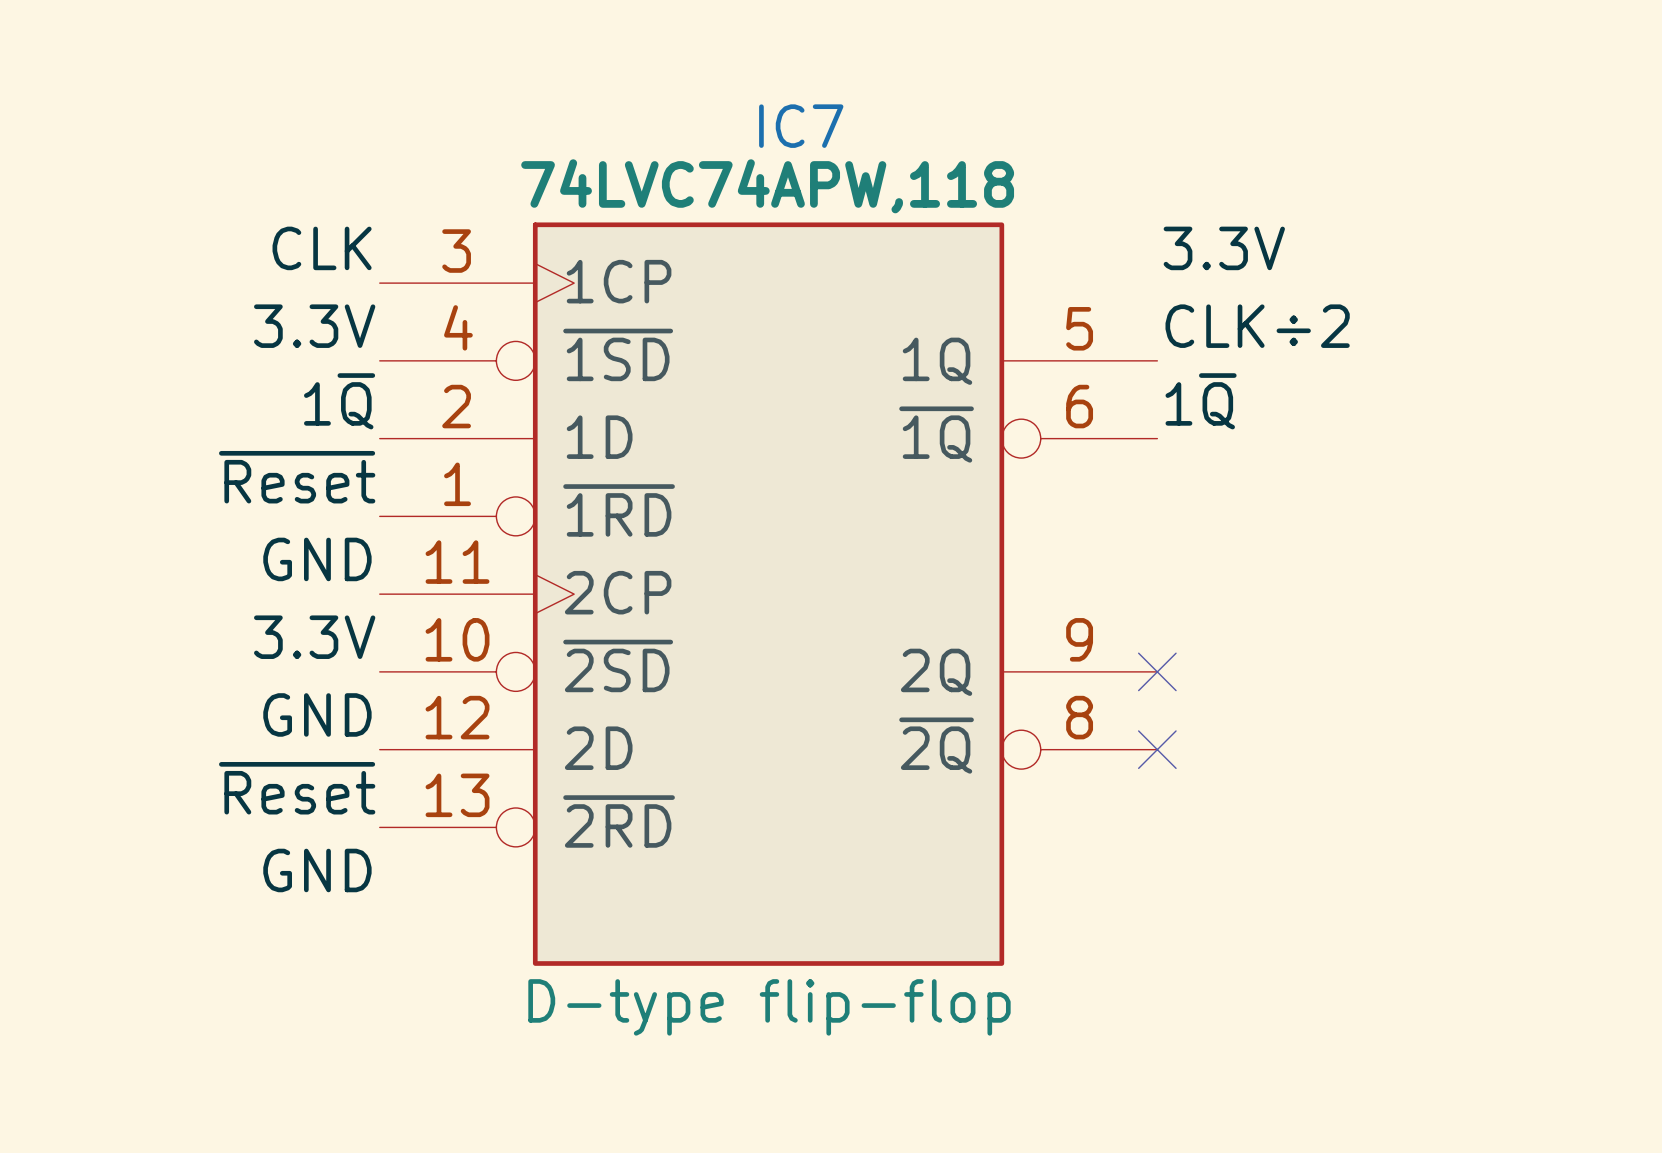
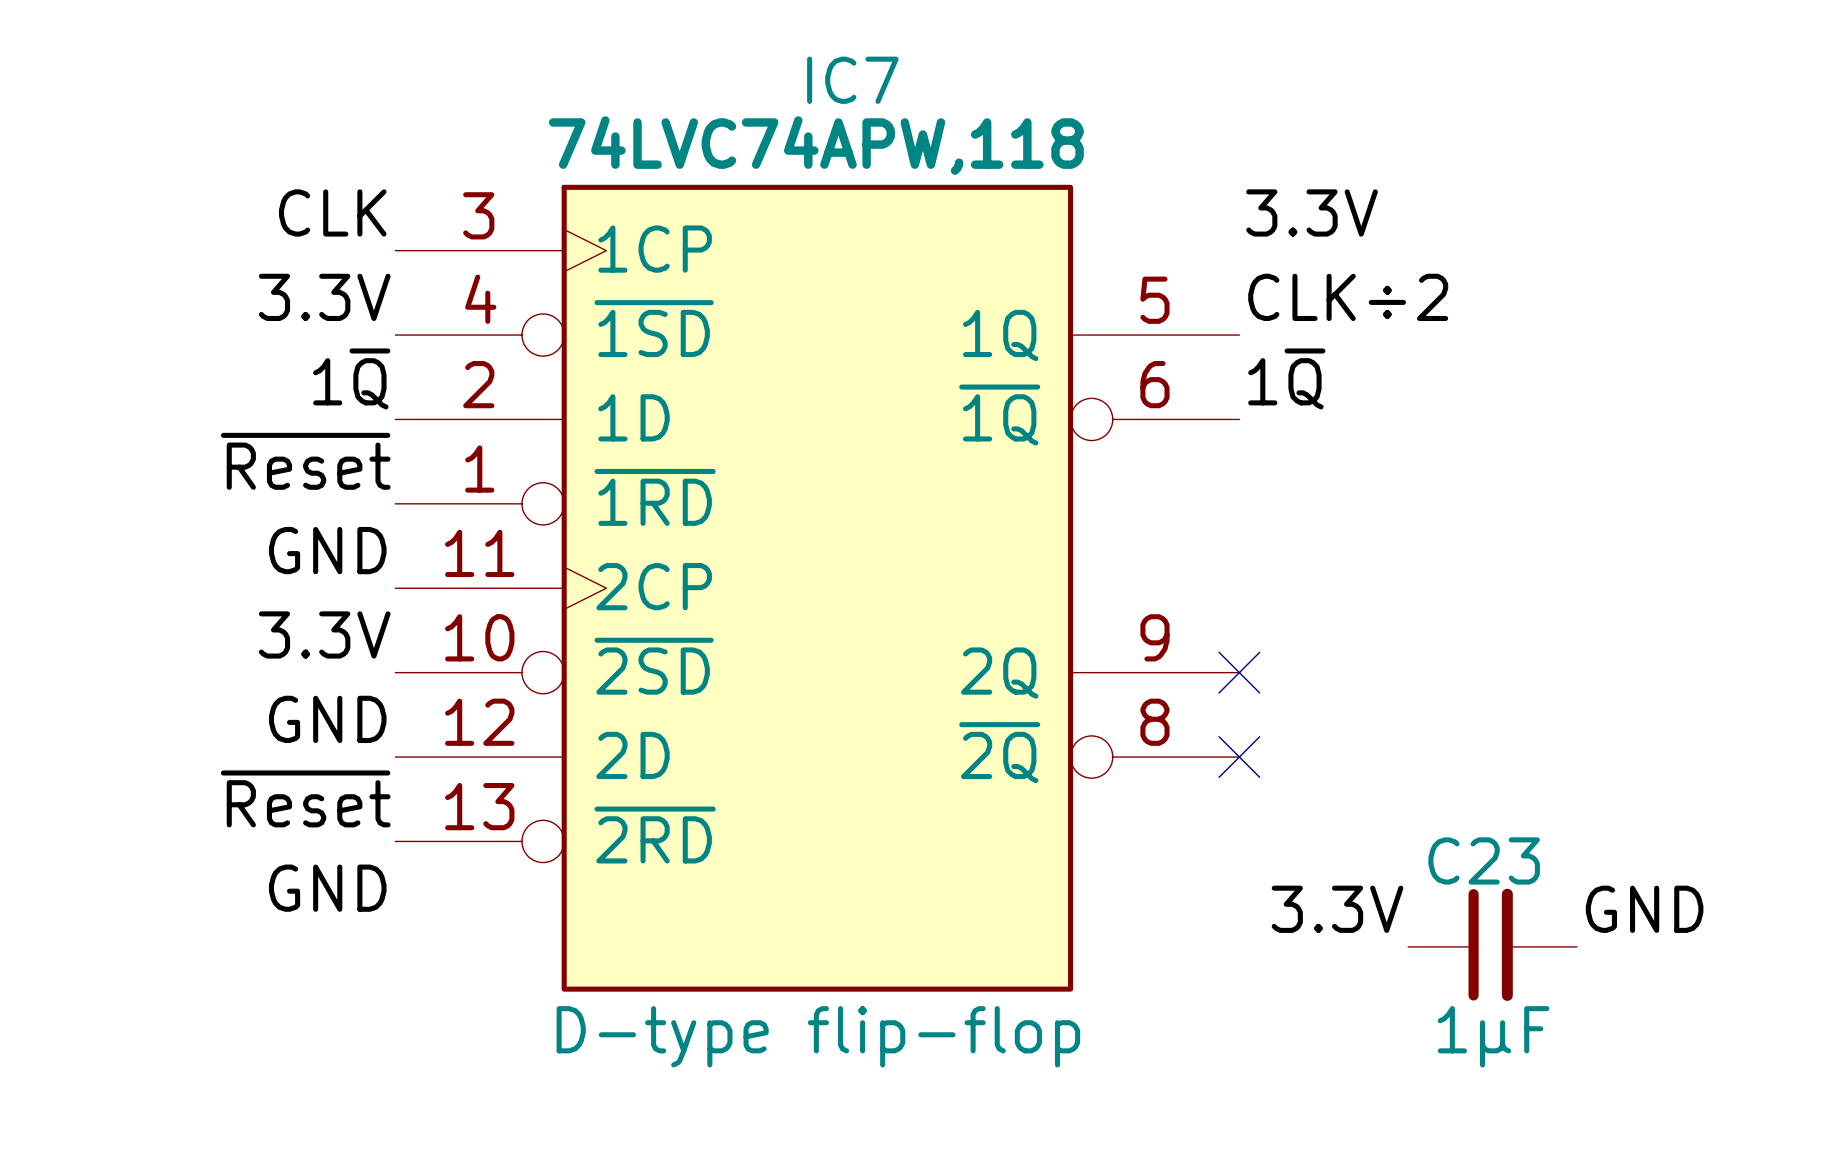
label: none -> 3.3V (1337, 909)
label: none -> GND (1644, 909)
C23: none -> 1μF (1492, 944)

